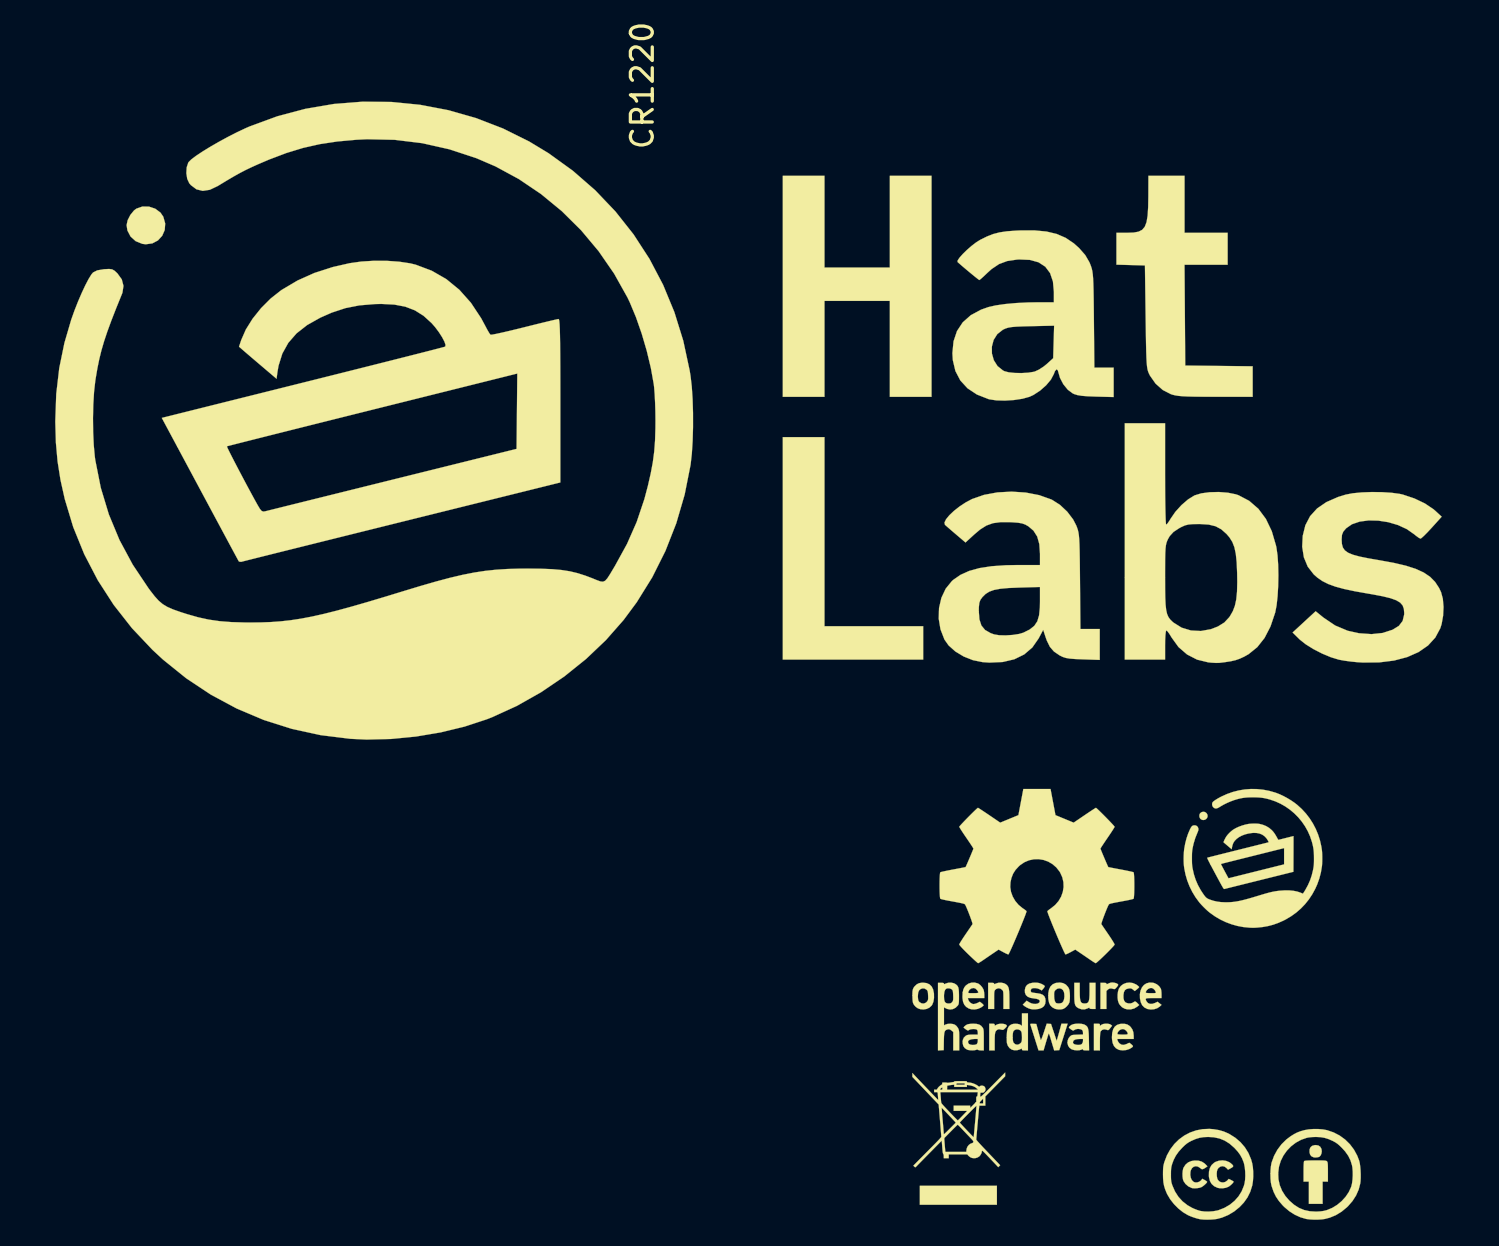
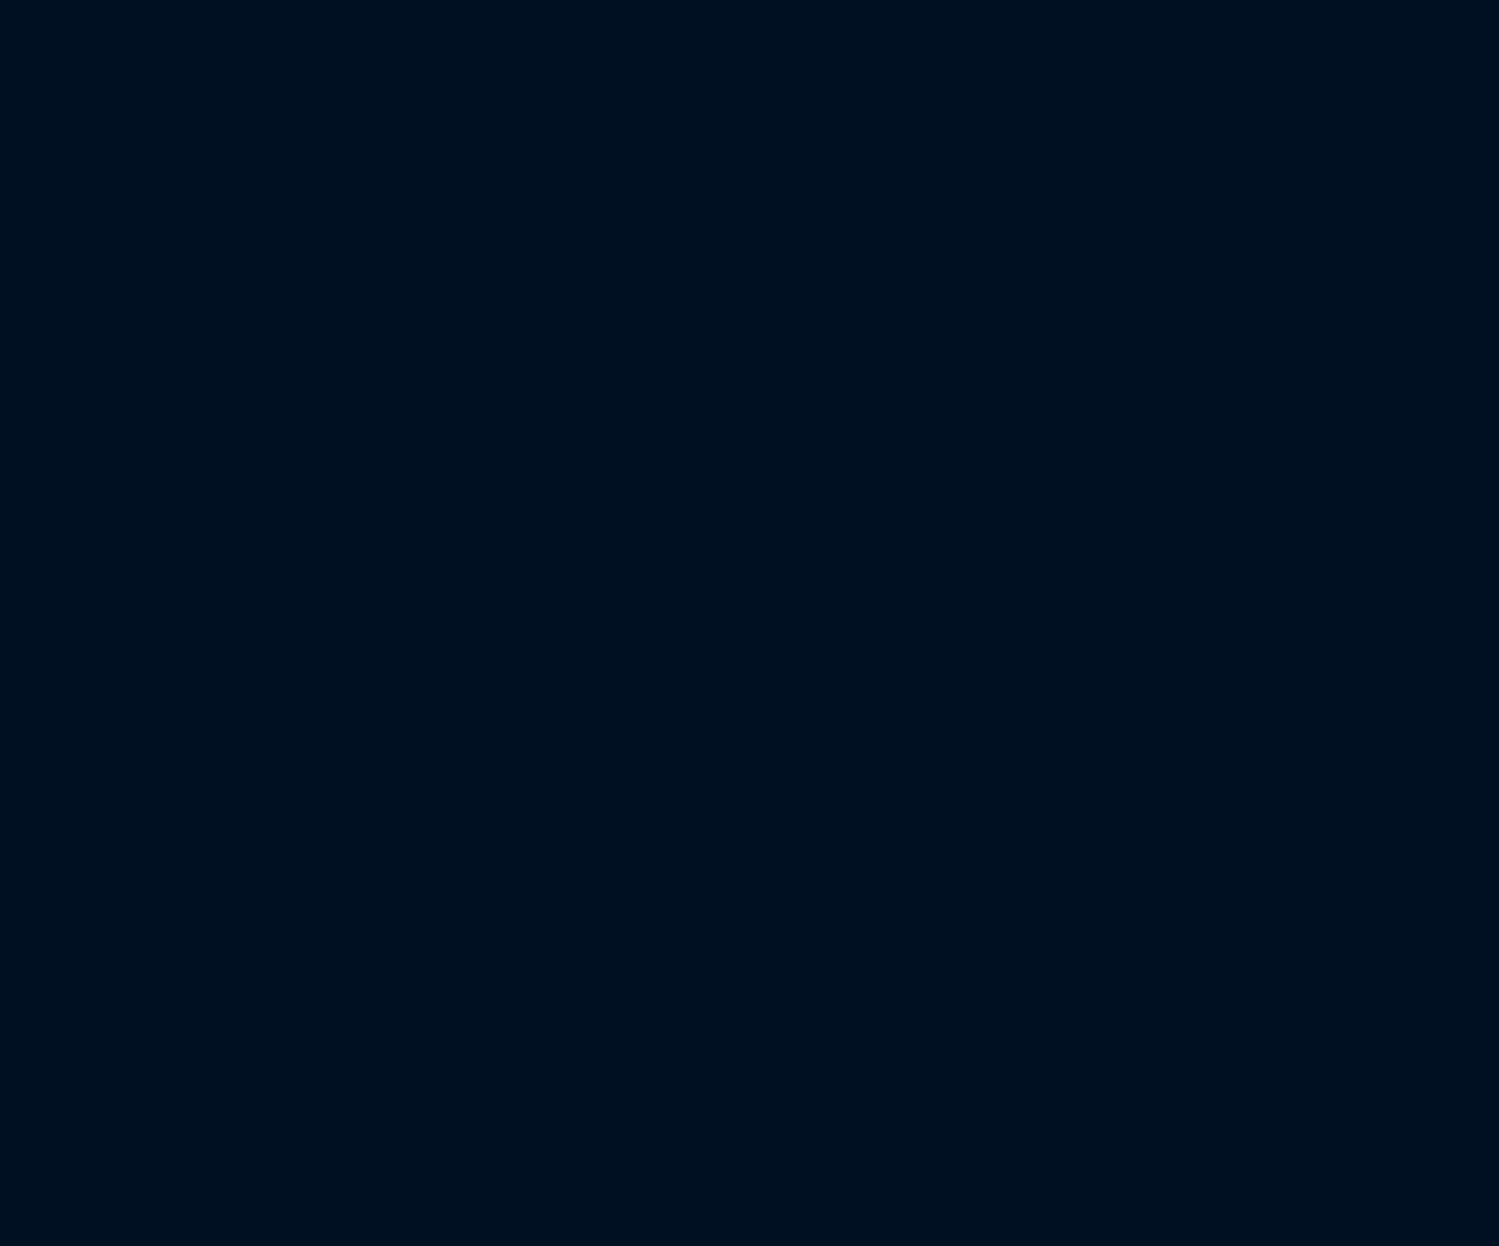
text: CR1220 (641, 85) -> none
drawing: [55, 101, 1444, 740] -> none
drawing: [912, 788, 1323, 1205] -> none
drawing: [1162, 1128, 1361, 1220] -> none

